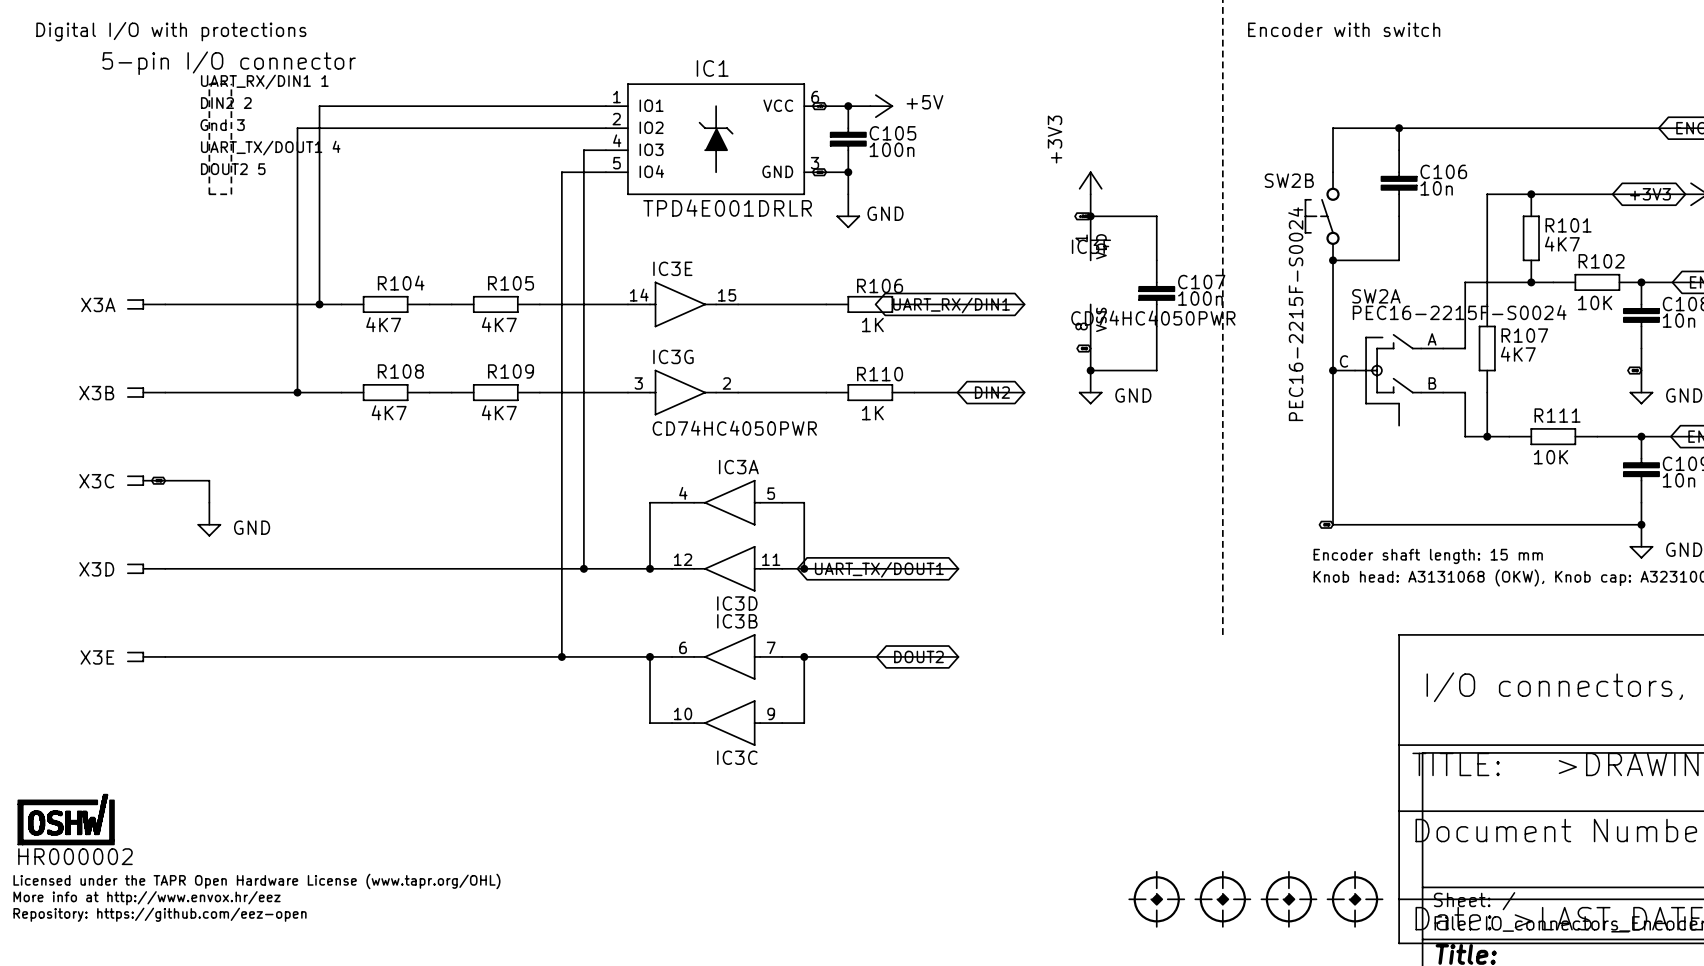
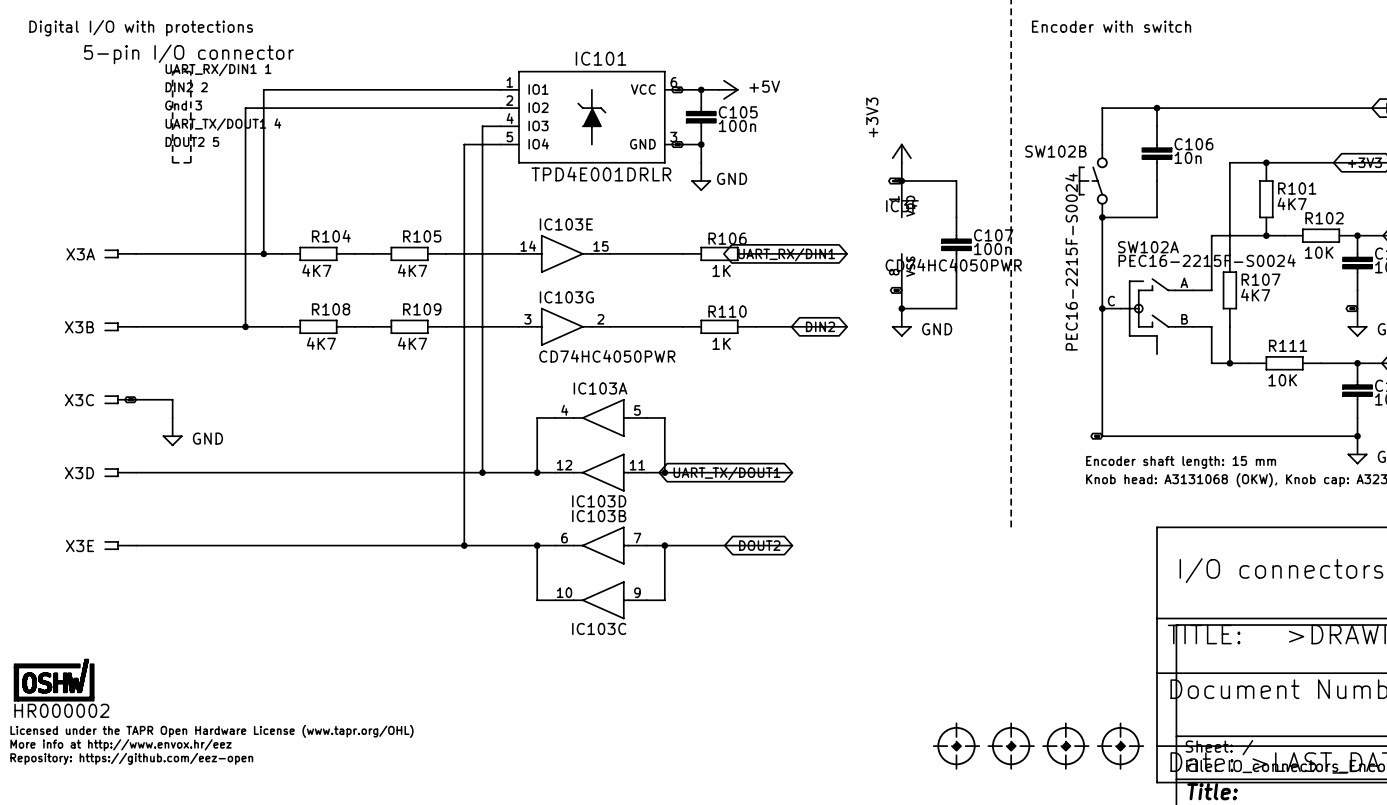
IC1 name: IC1 (712, 68) -> IC101 (601, 58)
SW2B name: SW2B (1289, 180) -> SW102B (1055, 151)
IC3E name: IC3E (672, 268) -> IC103E (566, 224)
SW2A name: SW2A (1376, 296) -> SW102A (1148, 247)
IC3G name: IC3G (673, 356) -> IC103G (566, 297)
IC3A name: IC3A (738, 467) -> IC103A (600, 388)
IC3D name: IC3D (737, 603) -> IC103D (599, 501)
IC3B name: IC3B (737, 621) -> IC103B (599, 516)
IC3C name: IC3C (737, 757) -> IC103C (599, 628)

